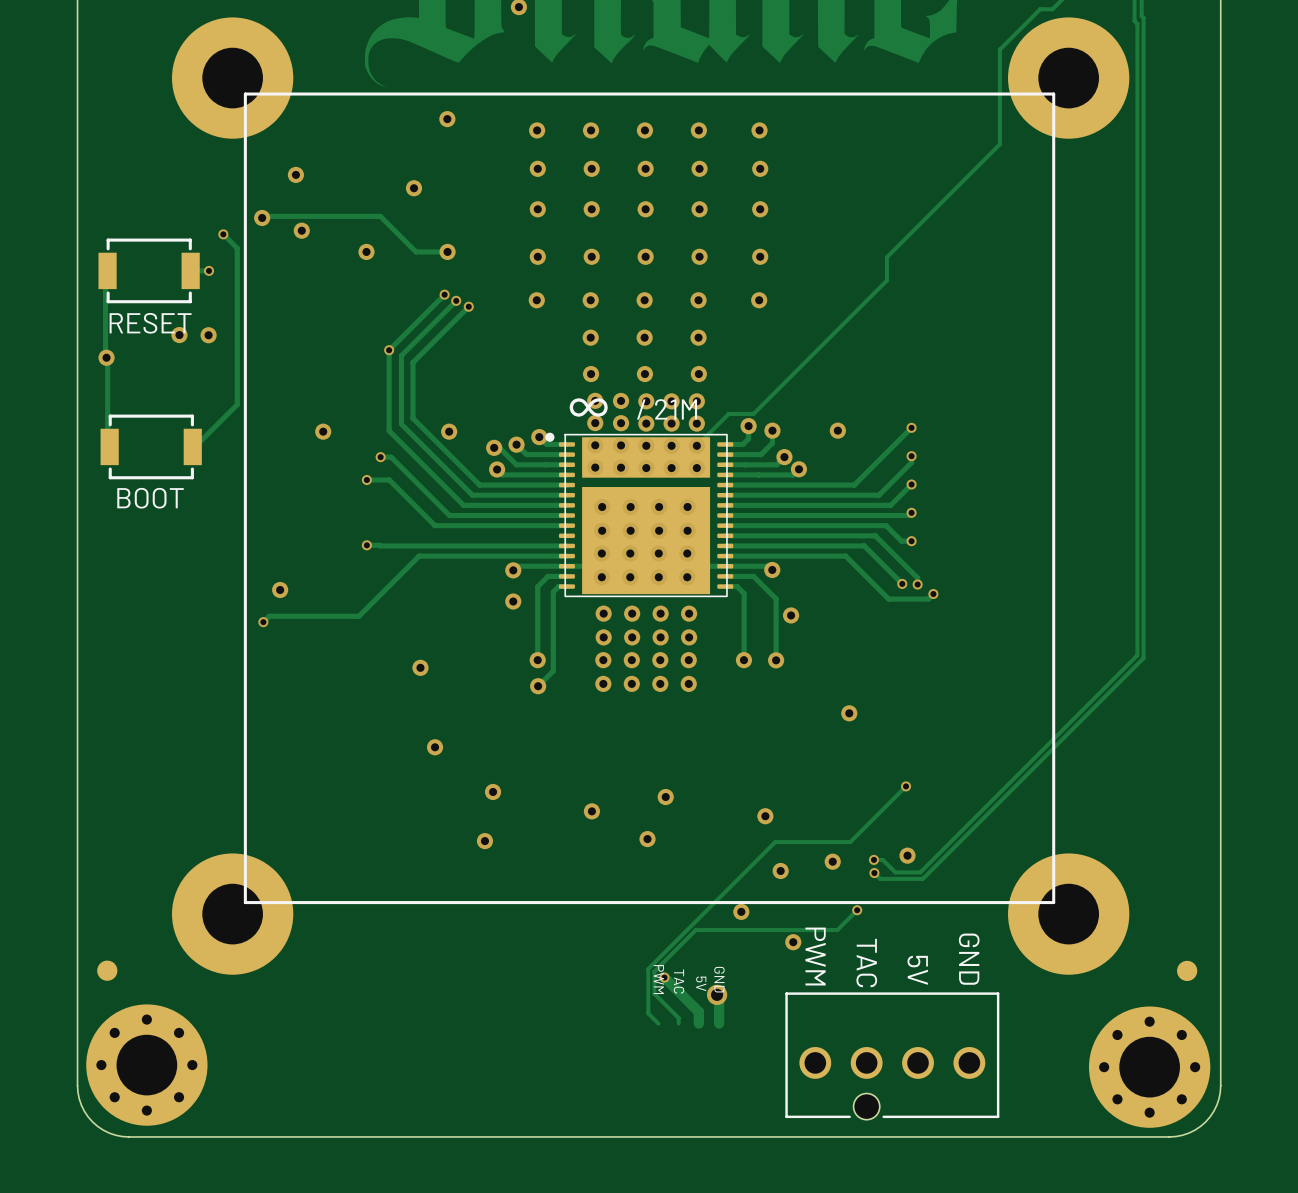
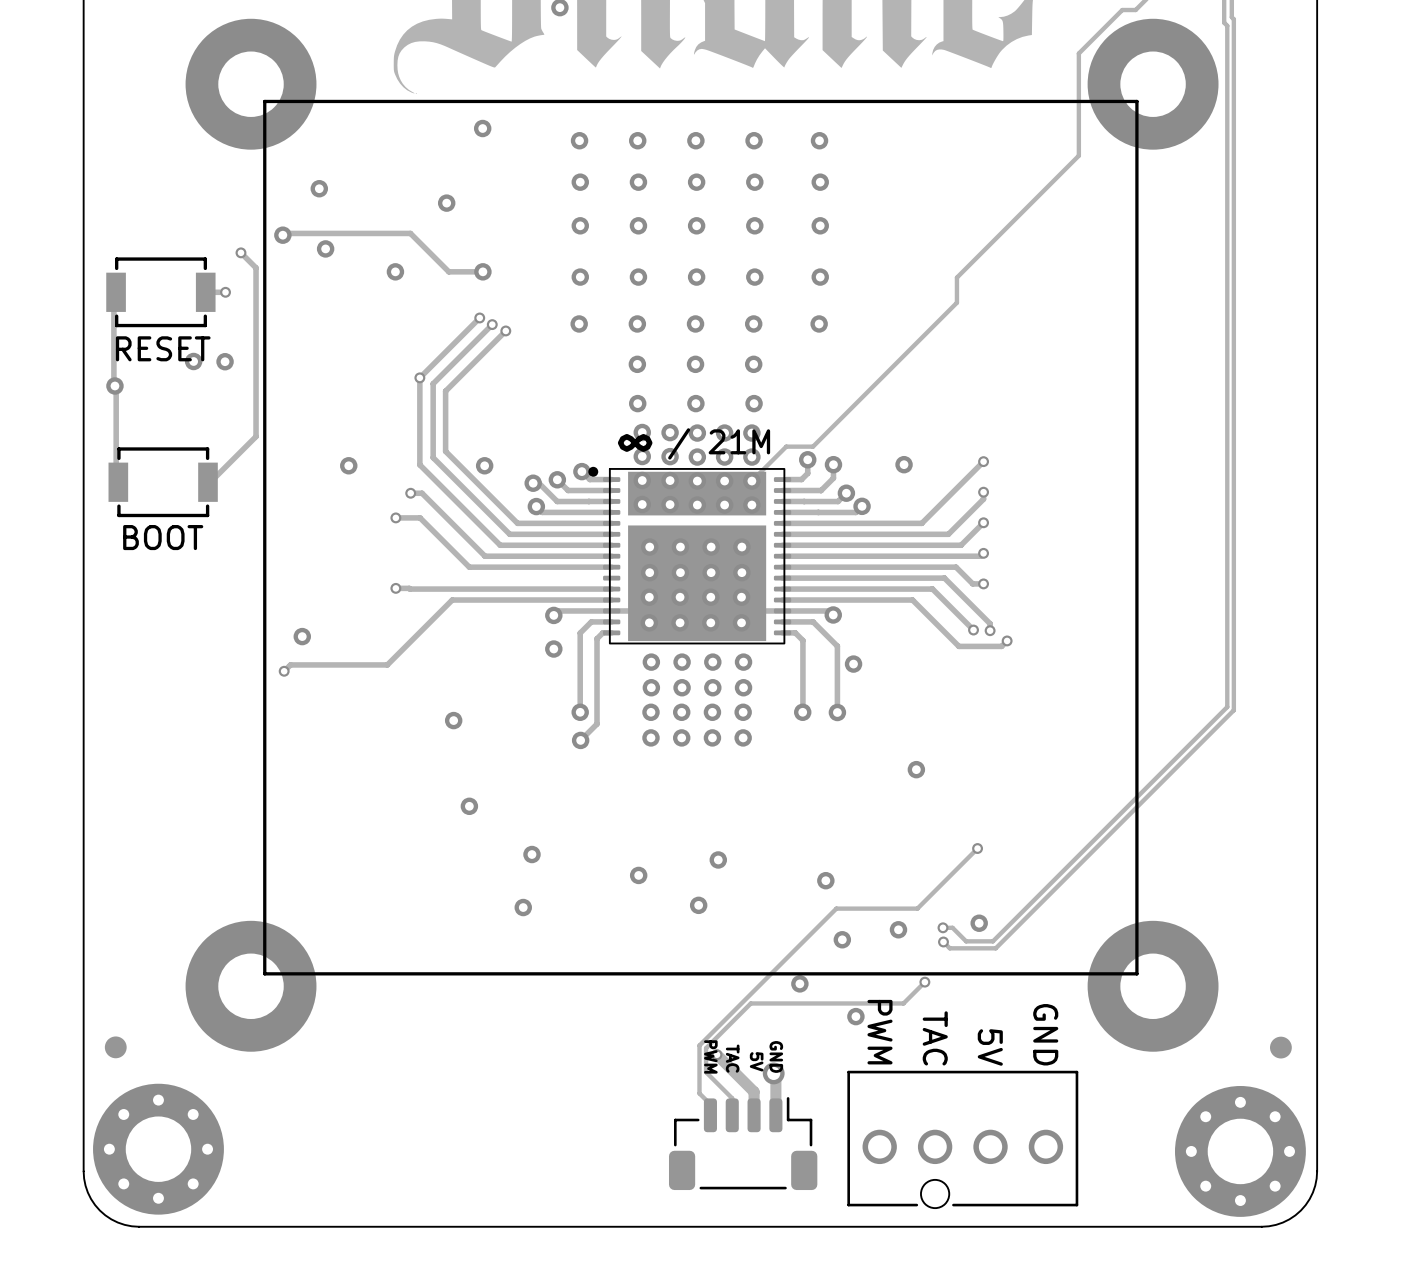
part: none -> (743, 1143)

